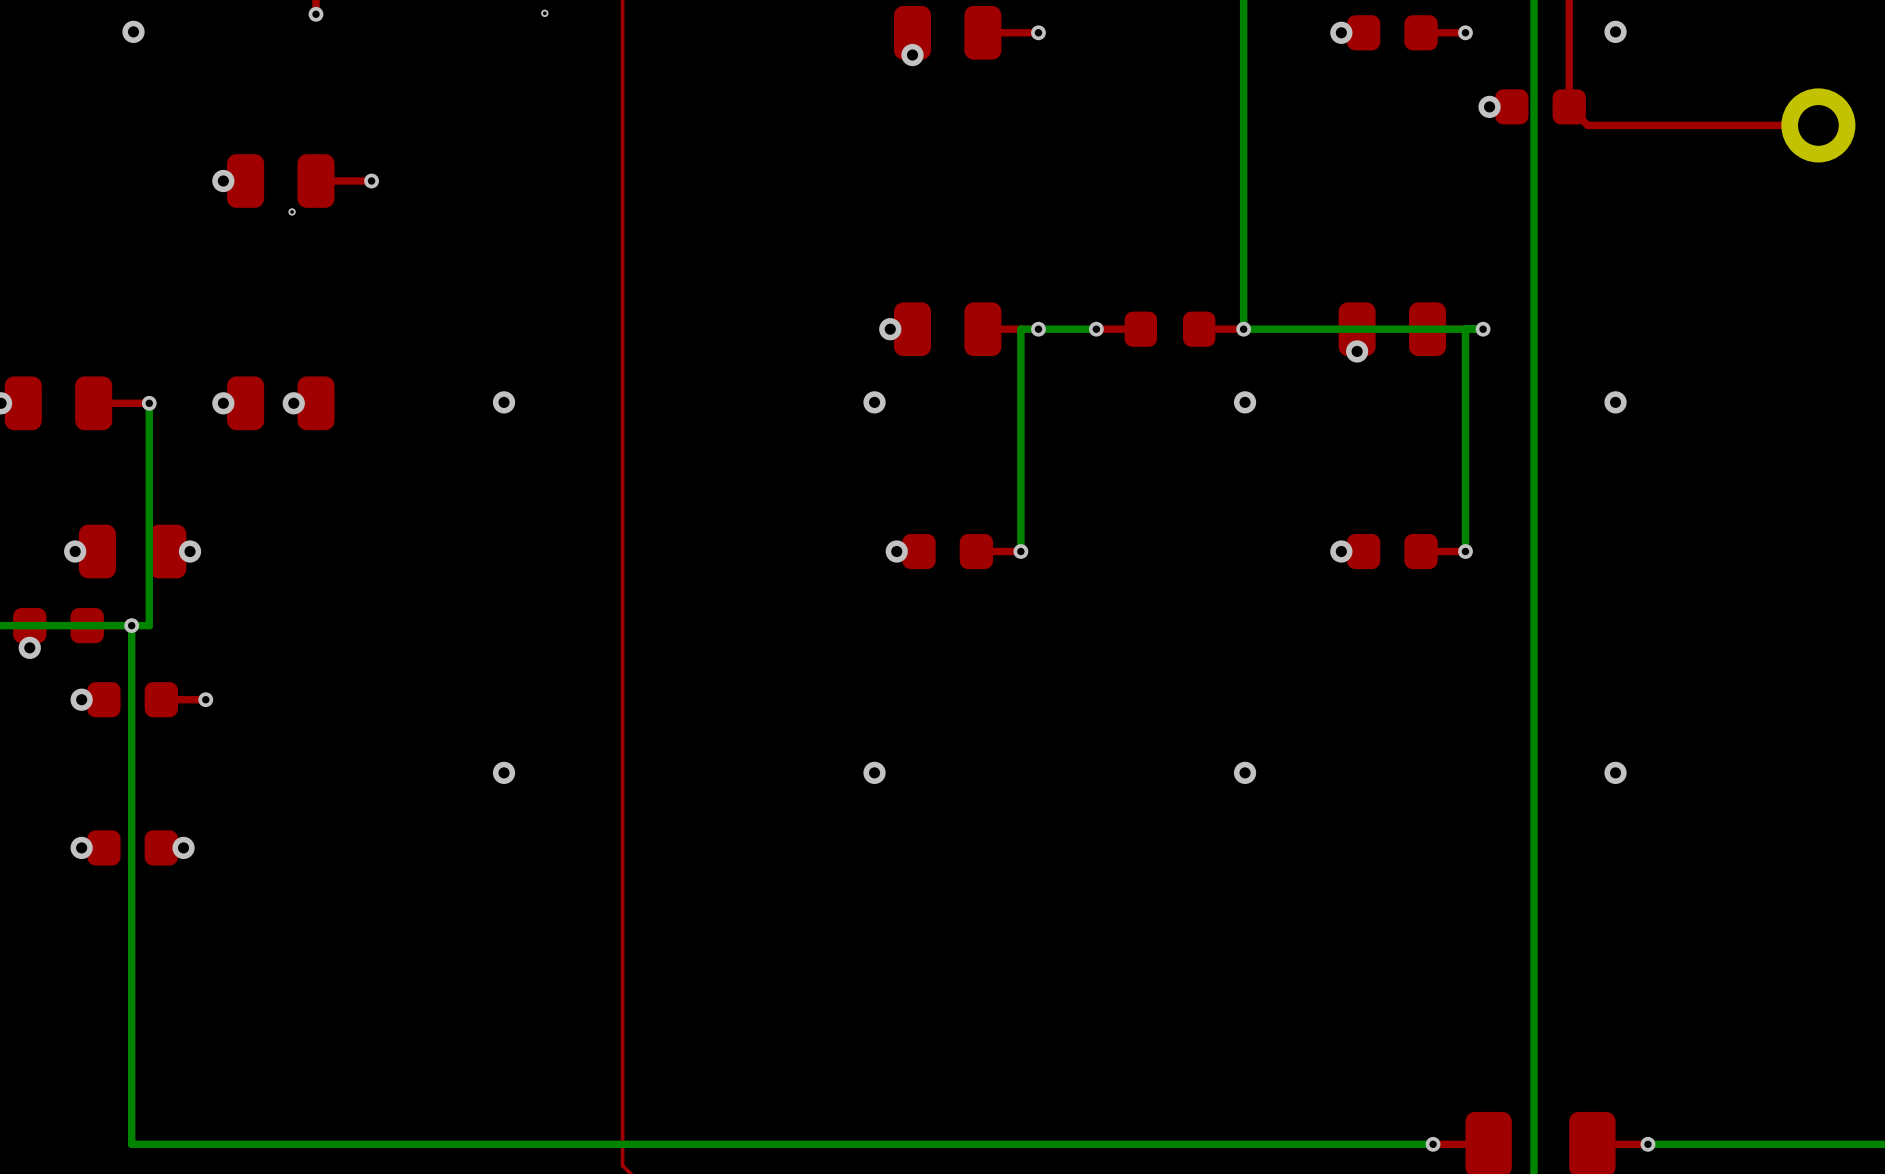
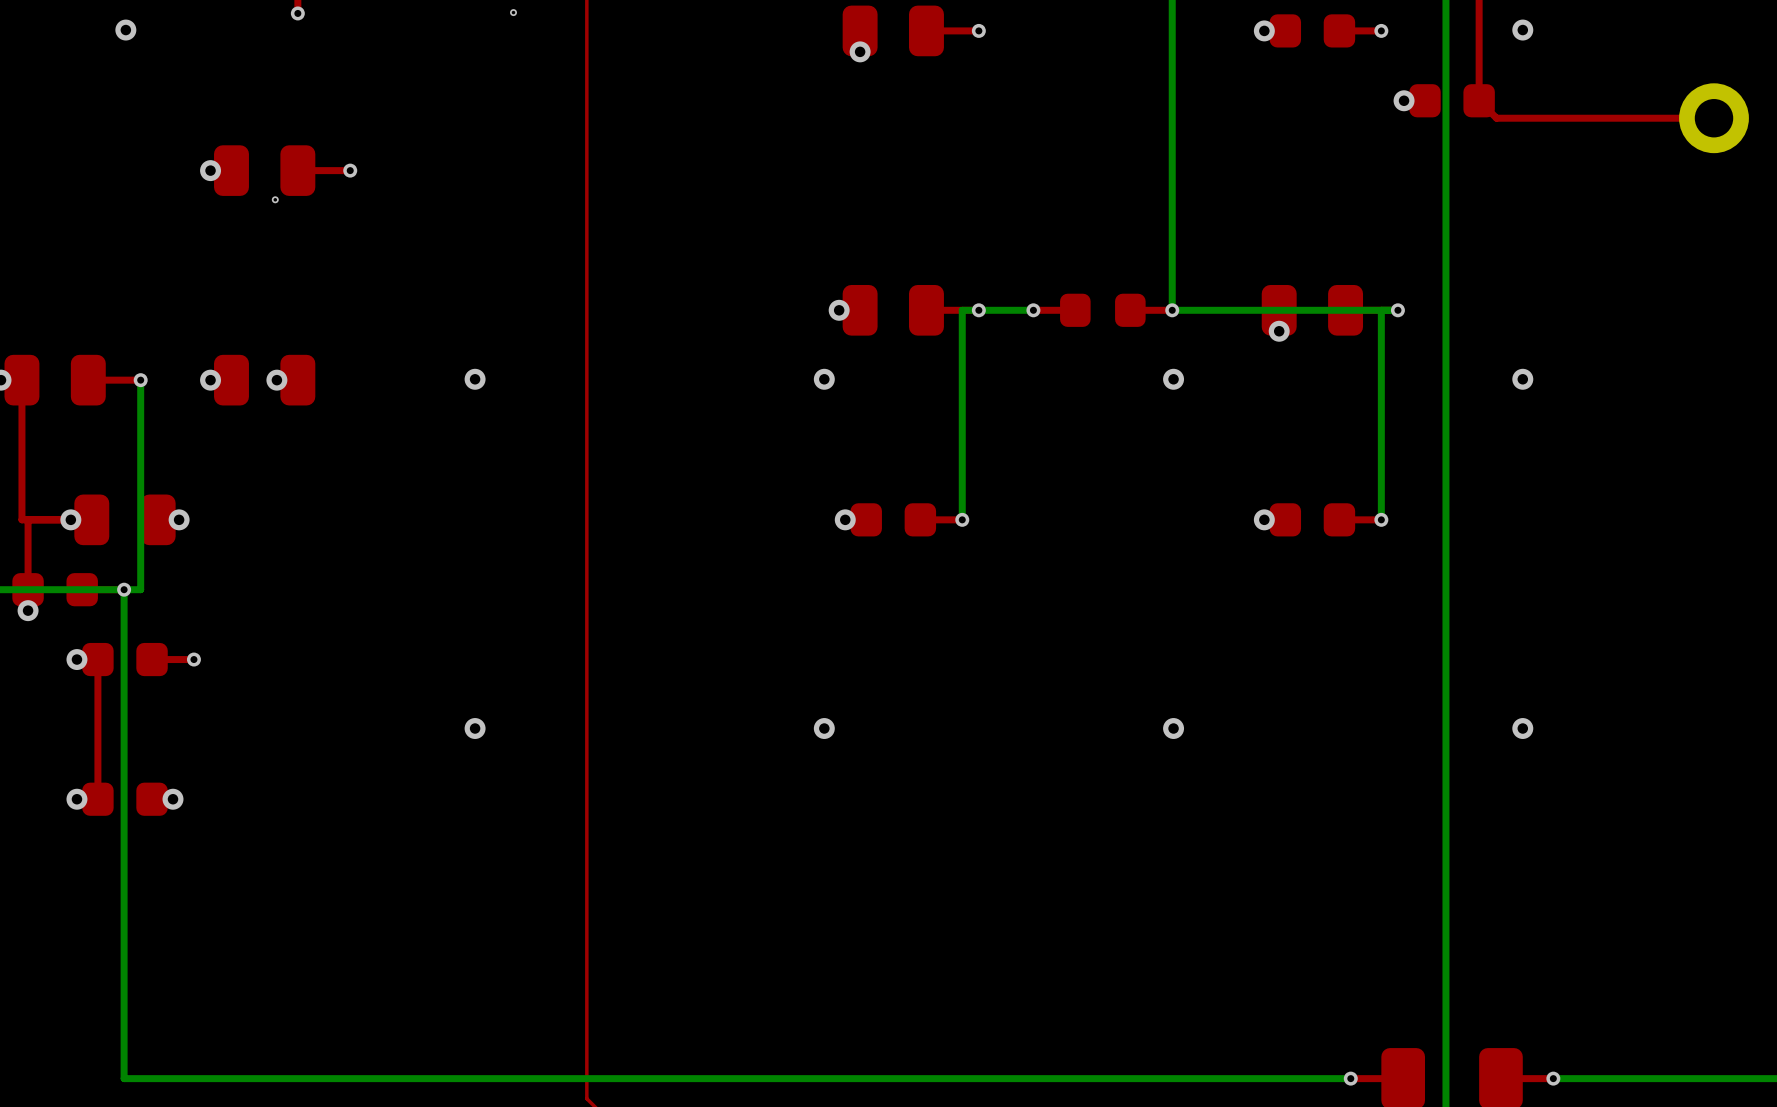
top track: none -> (21, 380) (21, 519) (91, 519)
top track: none -> (28, 519) (28, 589)
top track: none -> (97, 659) (97, 799)

